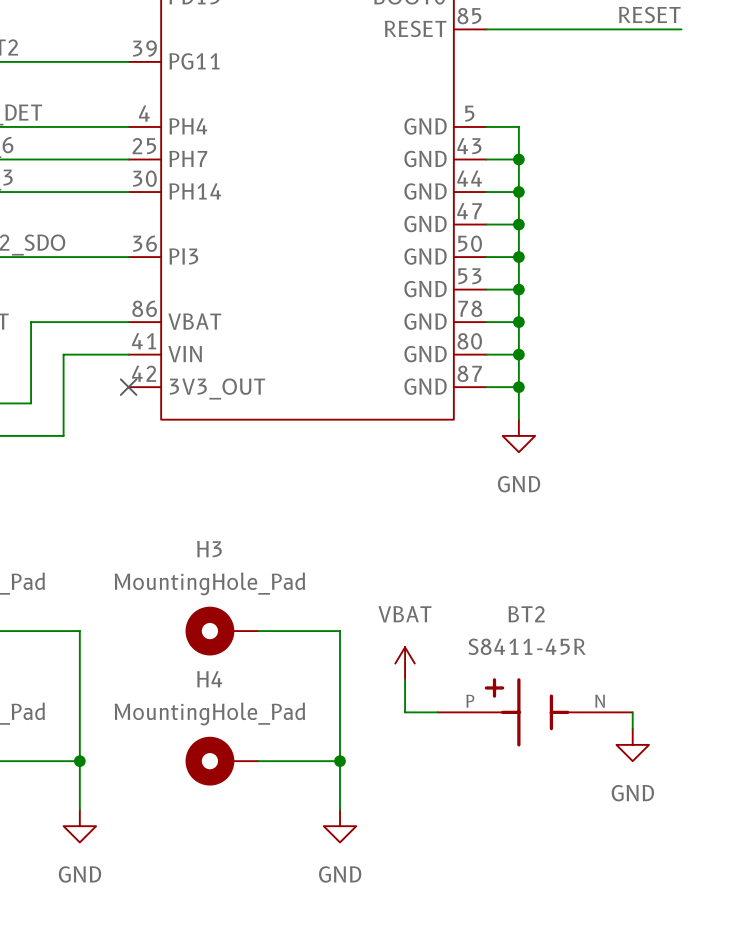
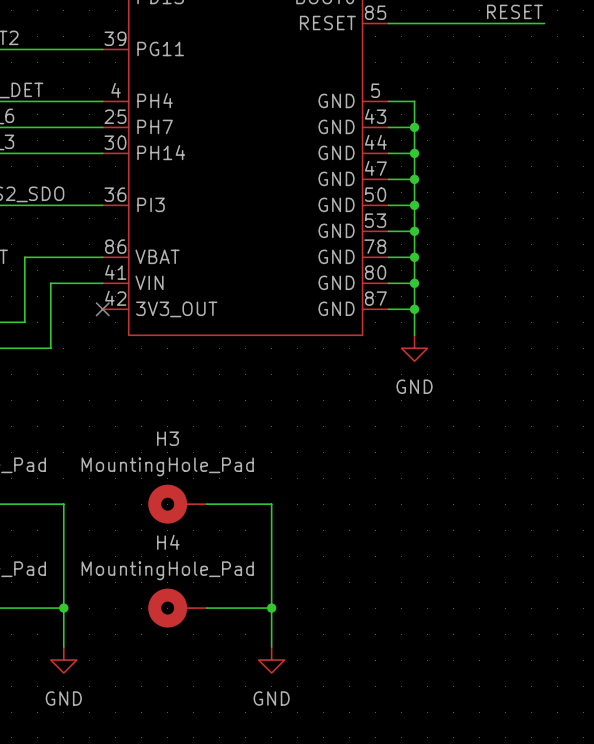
power symbol: VBAT (405, 663) -> none
wire: (405, 679) (405, 712) (437, 712) -> none
BT2: S8411-45R (535, 712) -> none
wire: (632, 712) (632, 728) -> none
power symbol: GND (632, 744) -> none

